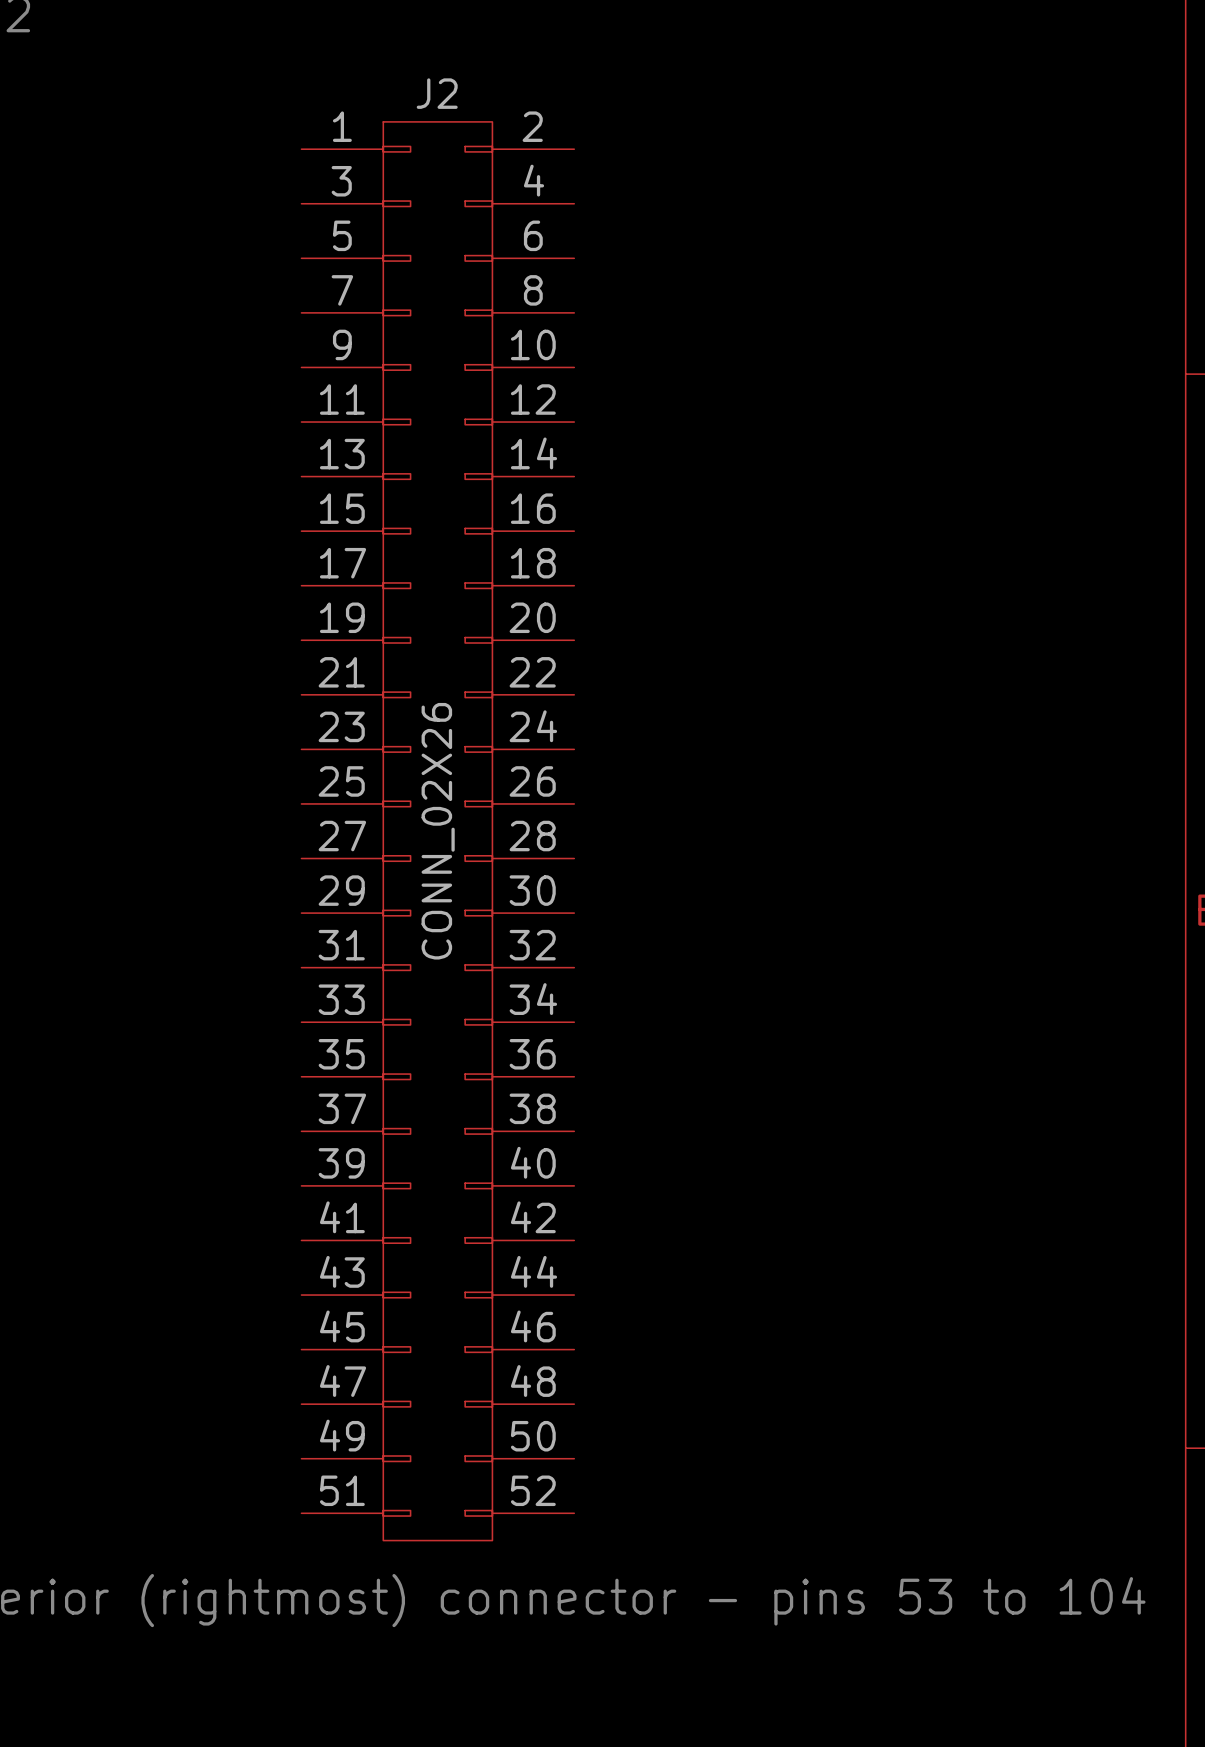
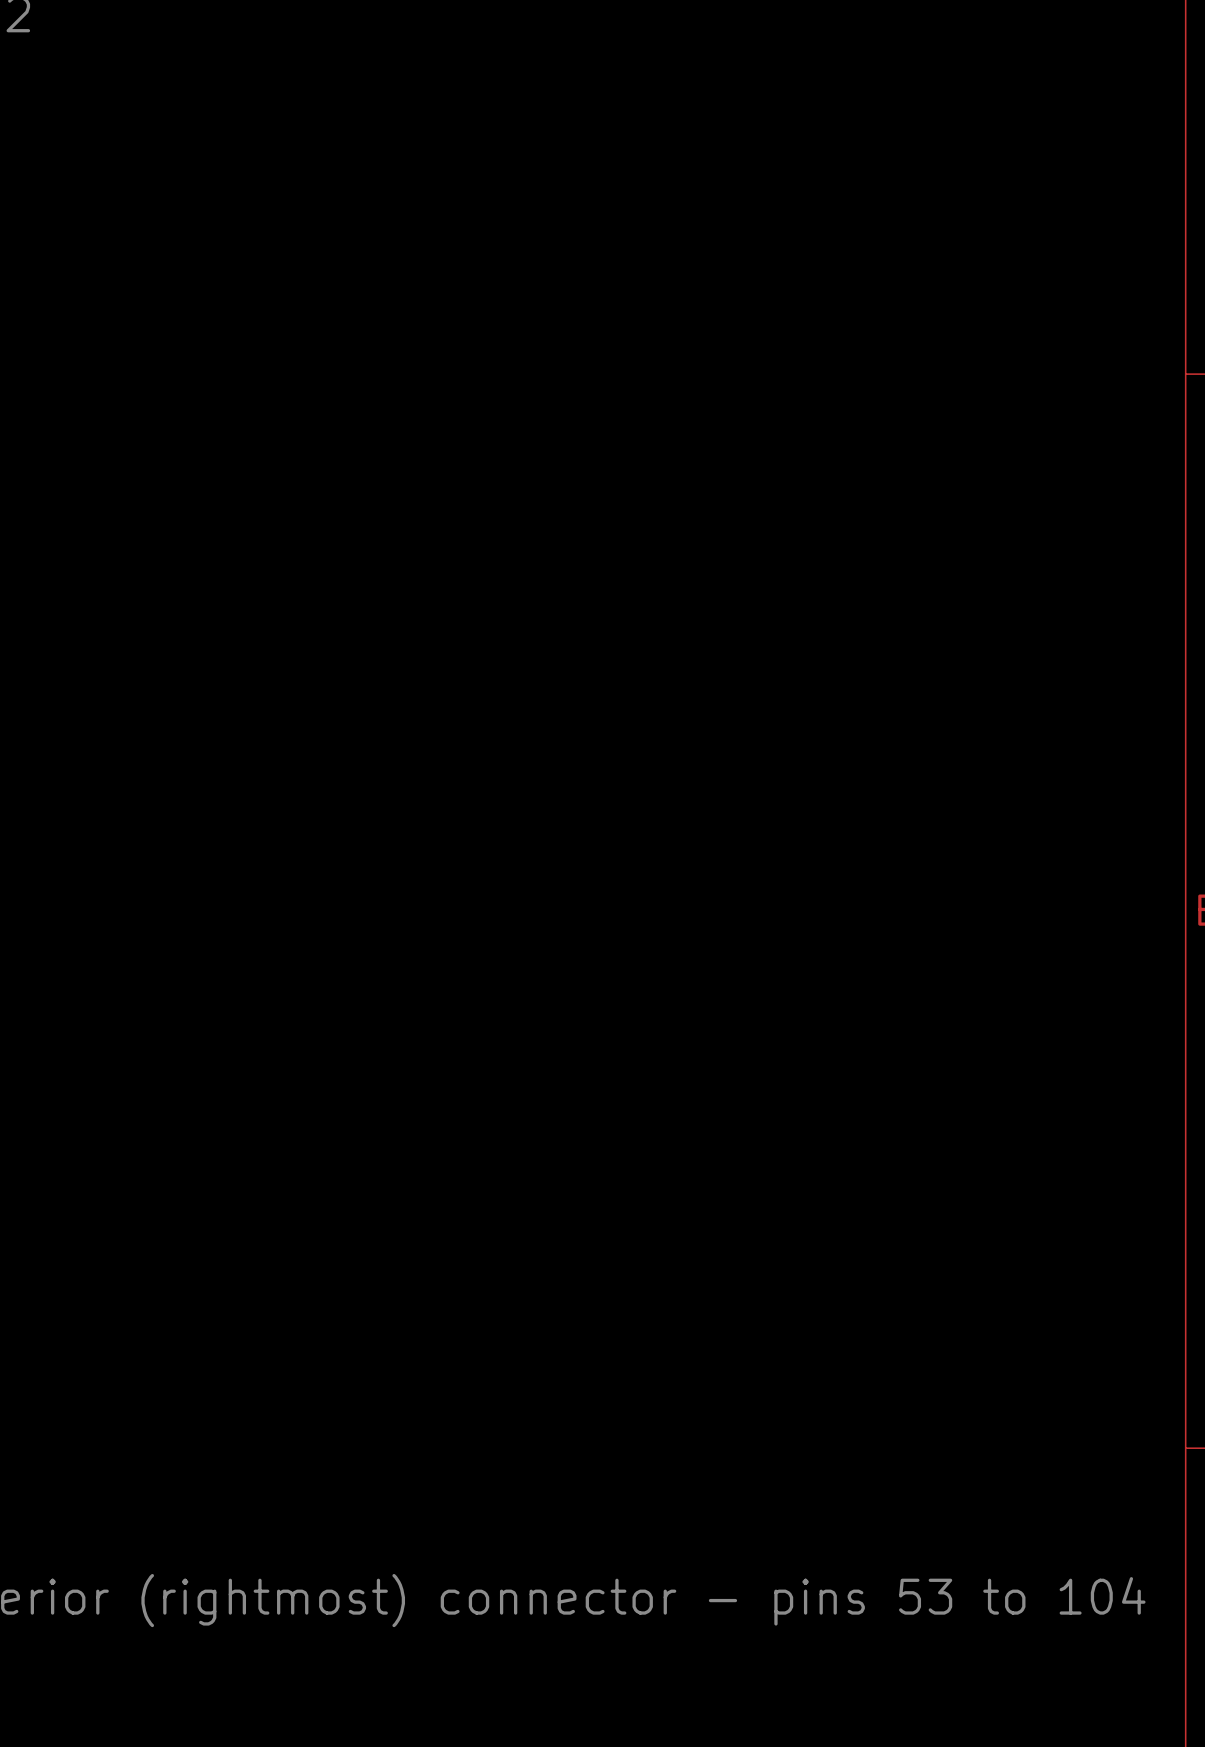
J2: CONN_02X26 (437, 831) -> none

